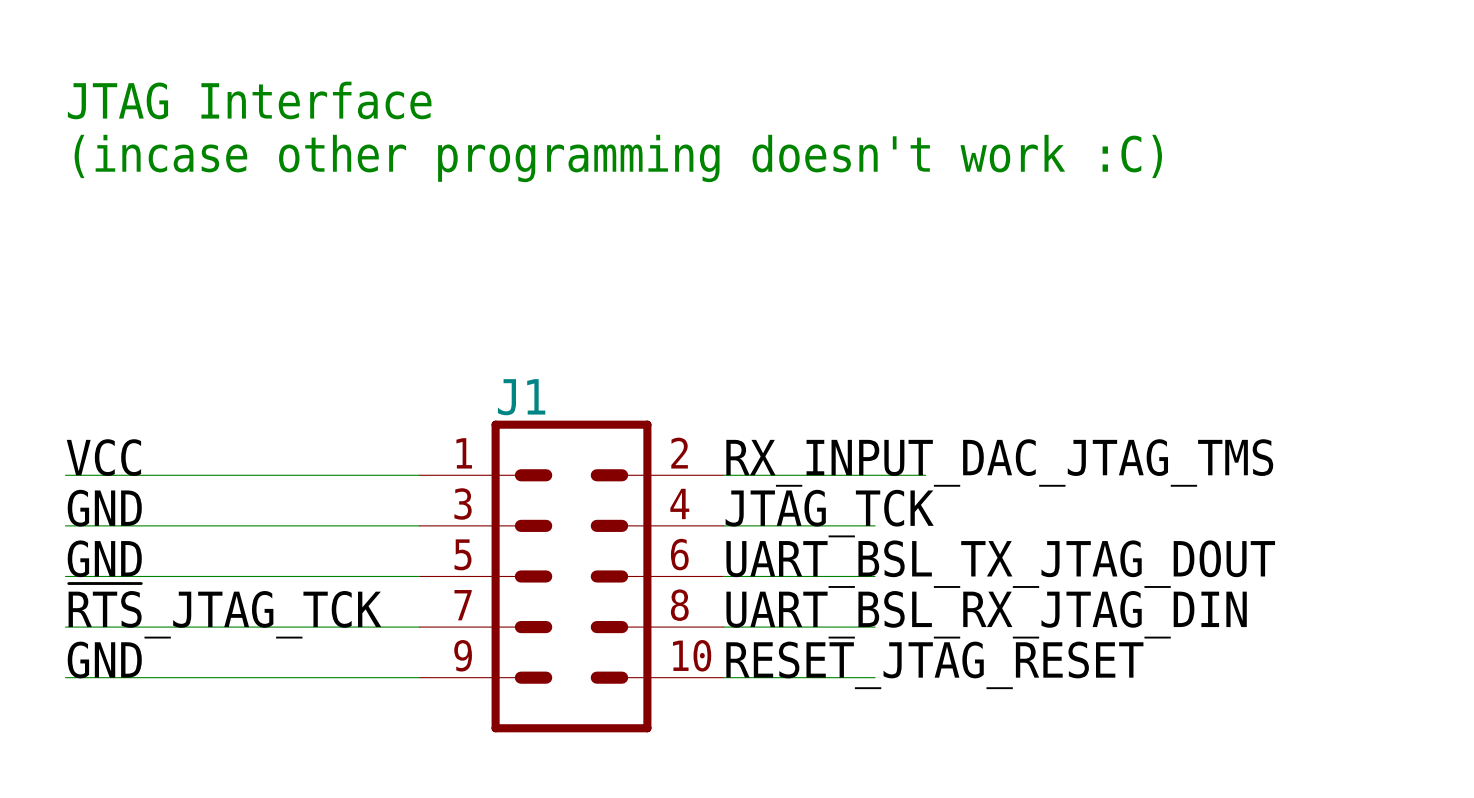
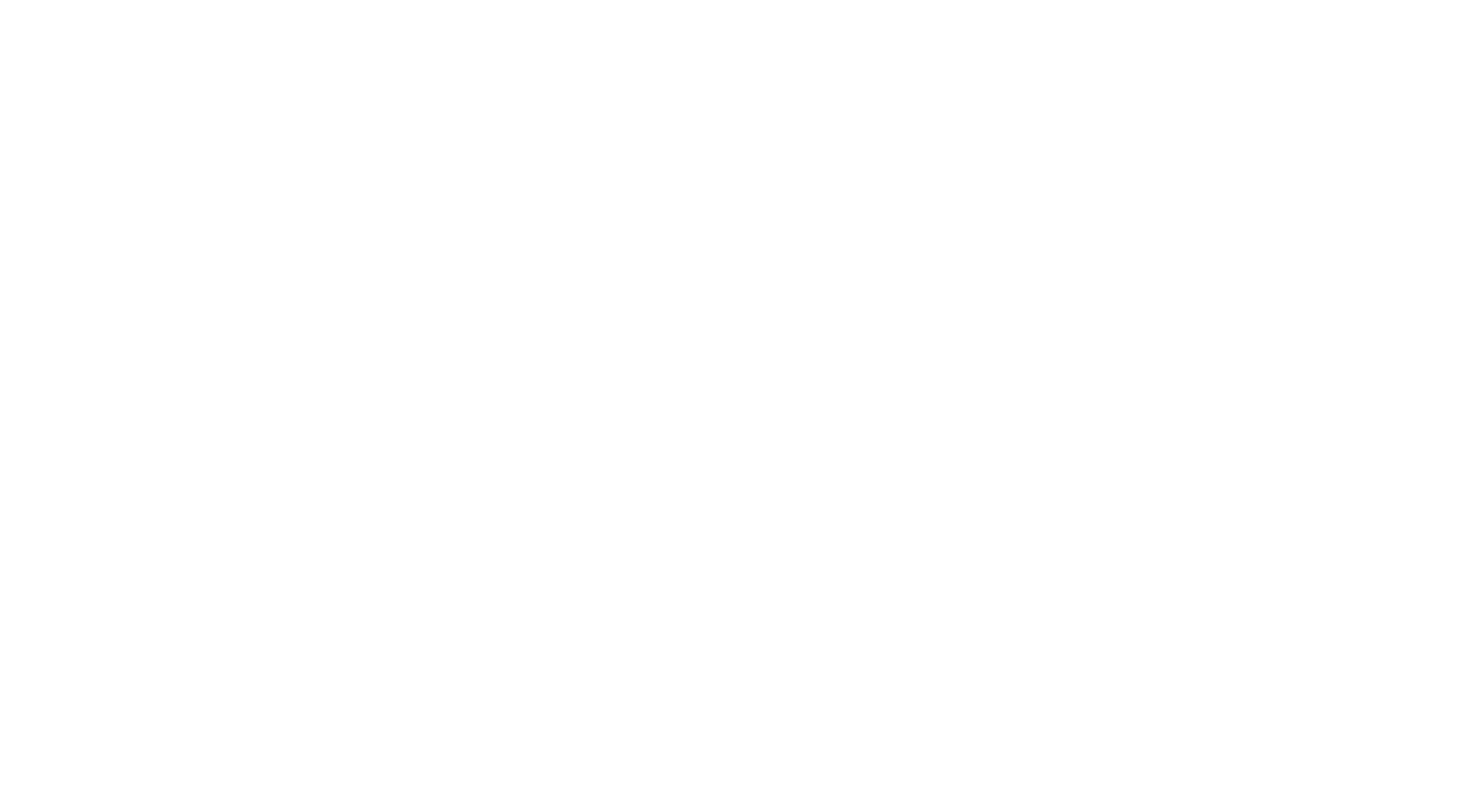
text: JTAG Interface (249, 100) -> none
text: (incase other programming doesn't work :C) (618, 158) -> none
label: VCC (103, 457) -> none
label: RX_INPUT_DAC_JTAG_TMS (999, 462) -> none
wire: (65, 475) (419, 475) -> none
wire: (723, 475) (925, 475) -> none
label: GND (104, 508) -> none
label: JTAG_TCK (829, 513) -> none
wire: (65, 525) (419, 525) -> none
wire: (723, 525) (875, 525) -> none
label: GND (104, 558) -> none
label: UART_BSL_TX_JTAG_DOUT (1000, 564) -> none
wire: (65, 576) (419, 576) -> none
J1: (571, 576) -> none
wire: (723, 576) (875, 576) -> none
label: ~{RTS}_JTAG_TCK (224, 611) -> none
label: UART_BSL_RX_JTAG_DIN (986, 614) -> none
wire: (65, 627) (419, 627) -> none
wire: (723, 627) (875, 627) -> none
label: GND (104, 659) -> none
label: RESET_JTAG_RESET (934, 665) -> none
wire: (65, 677) (419, 677) -> none
wire: (723, 677) (875, 677) -> none

